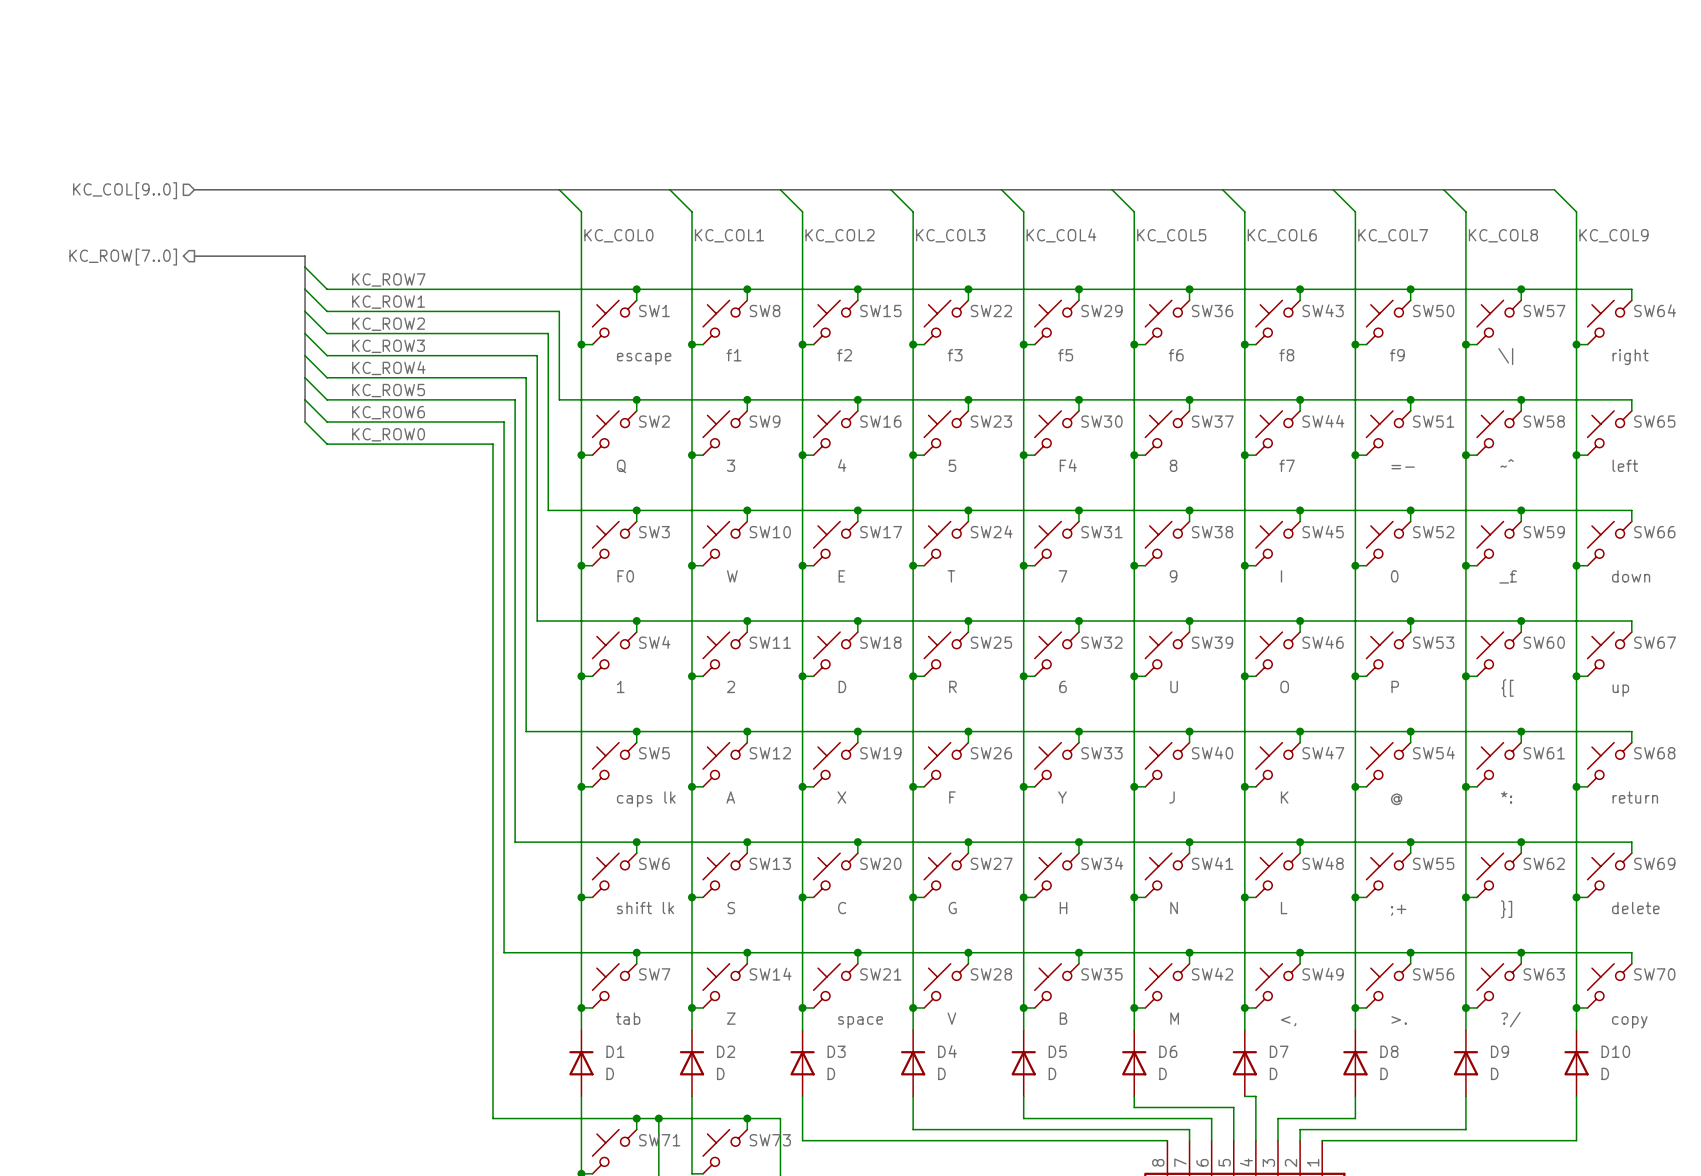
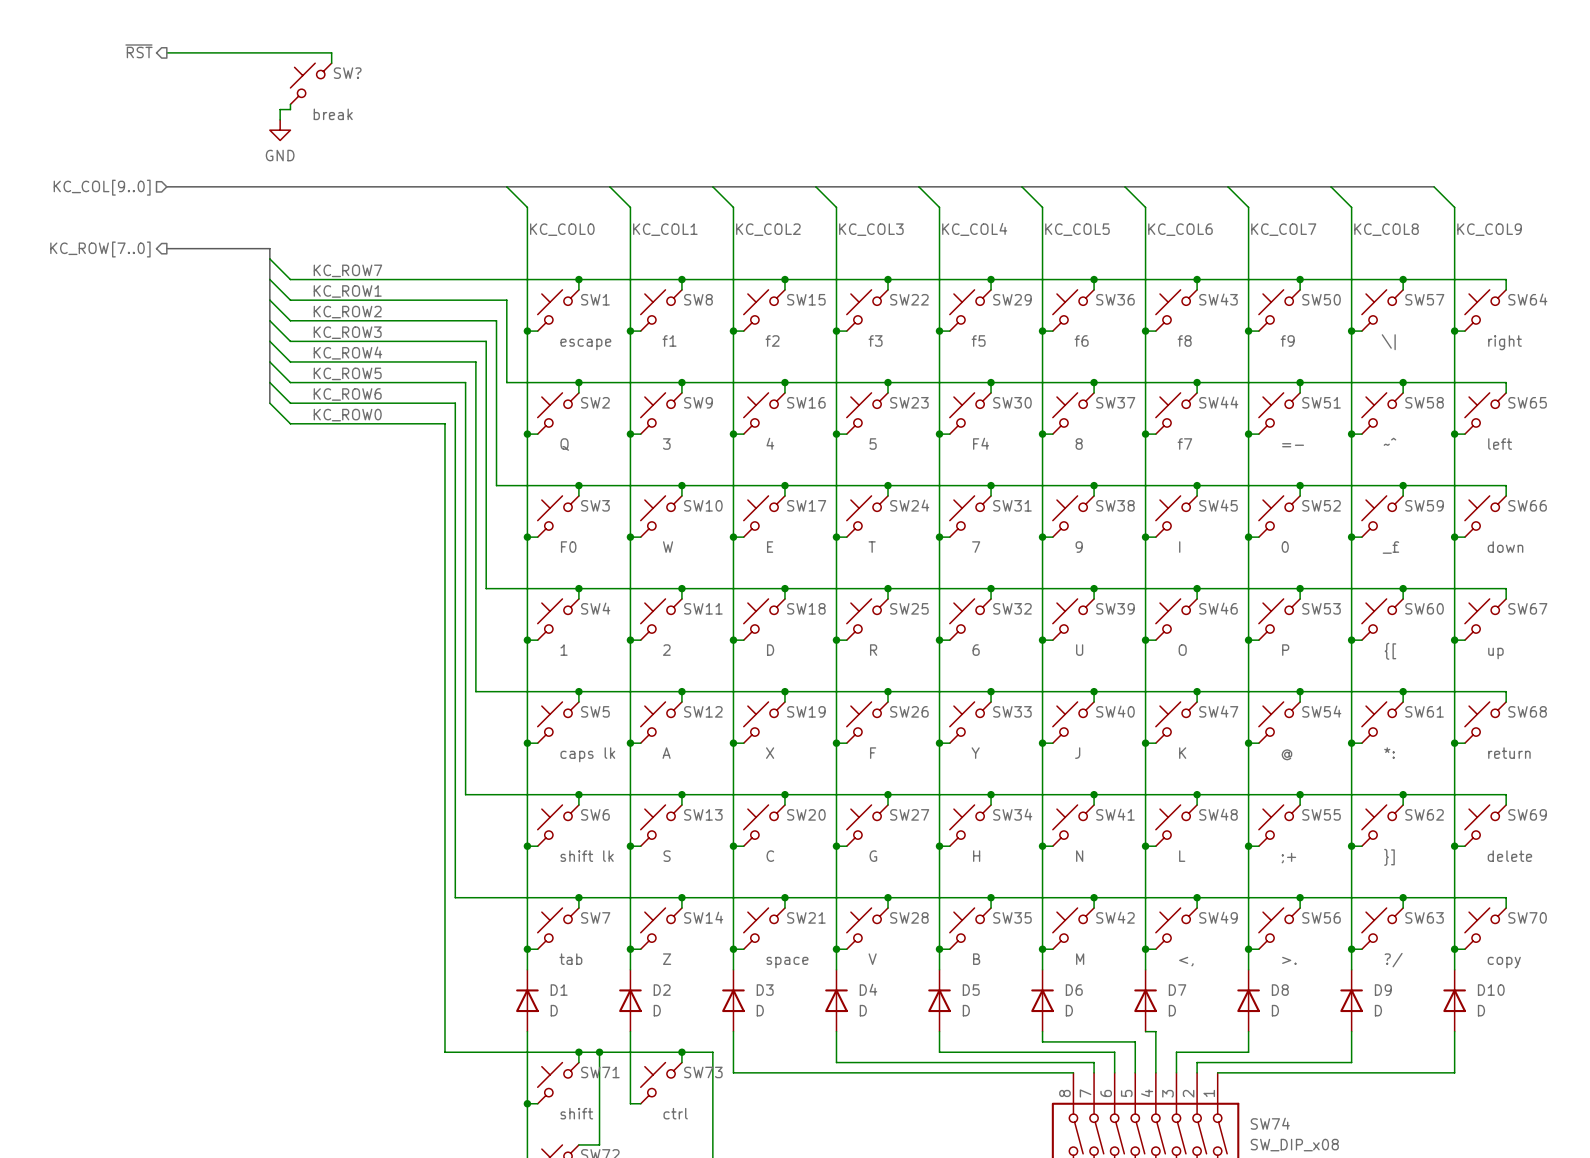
hierarchical label: none -> ~{RST} (138, 51)
wire: none -> (166, 52) (331, 52) (331, 63)
SW?: none -> break (311, 83)
wire: none -> (290, 104) (290, 109) (280, 109) (280, 119)
power symbol: none -> GND (280, 130)

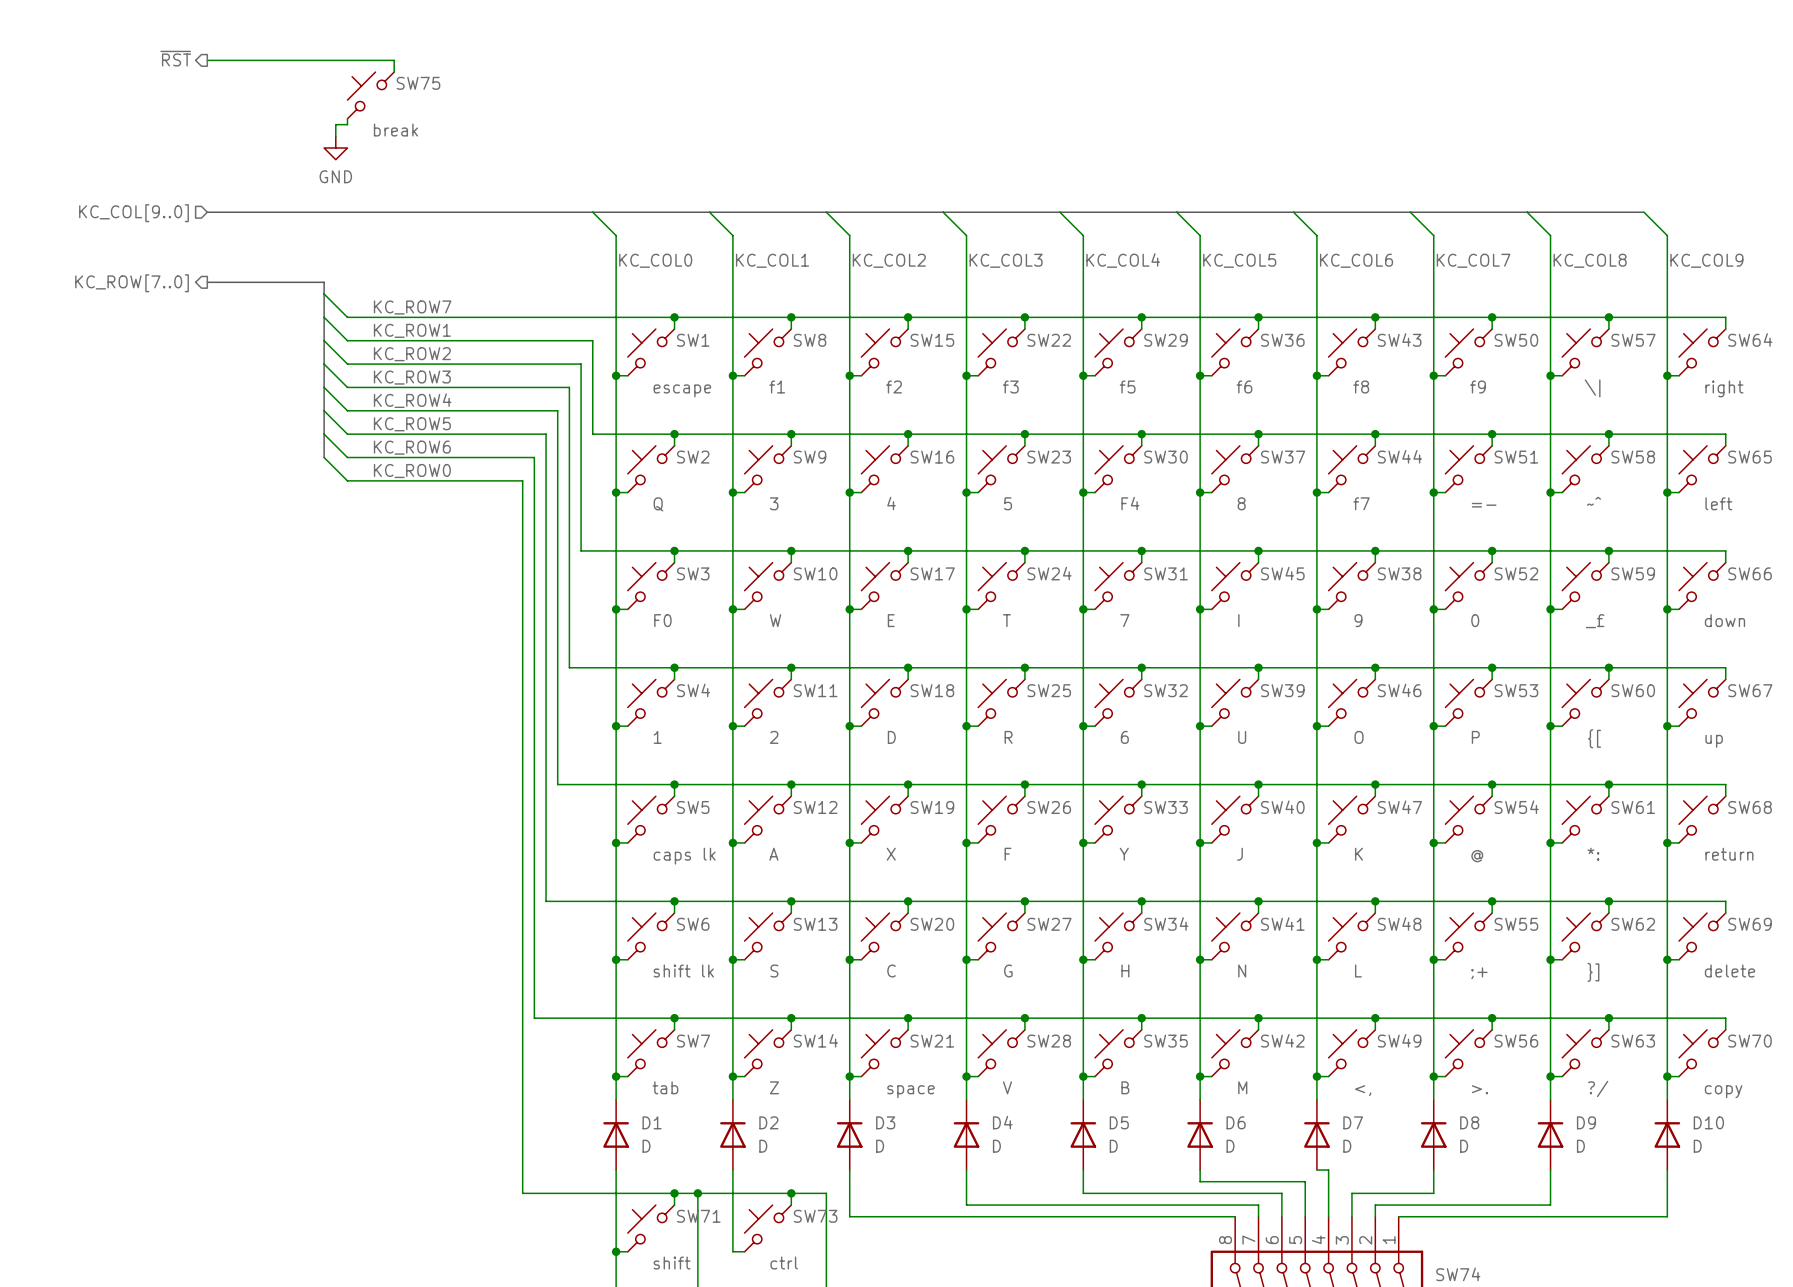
SW? name: SW? (347, 73) -> SW75 (418, 83)
SW38 name: SW38 (1115, 505) -> SW45 (1282, 573)
SW45 name: SW45 (1218, 505) -> SW38 (1399, 573)
SW38 value: 9 (1079, 547) -> I (1238, 620)
SW45 value: I (1179, 547) -> 9 (1358, 620)

